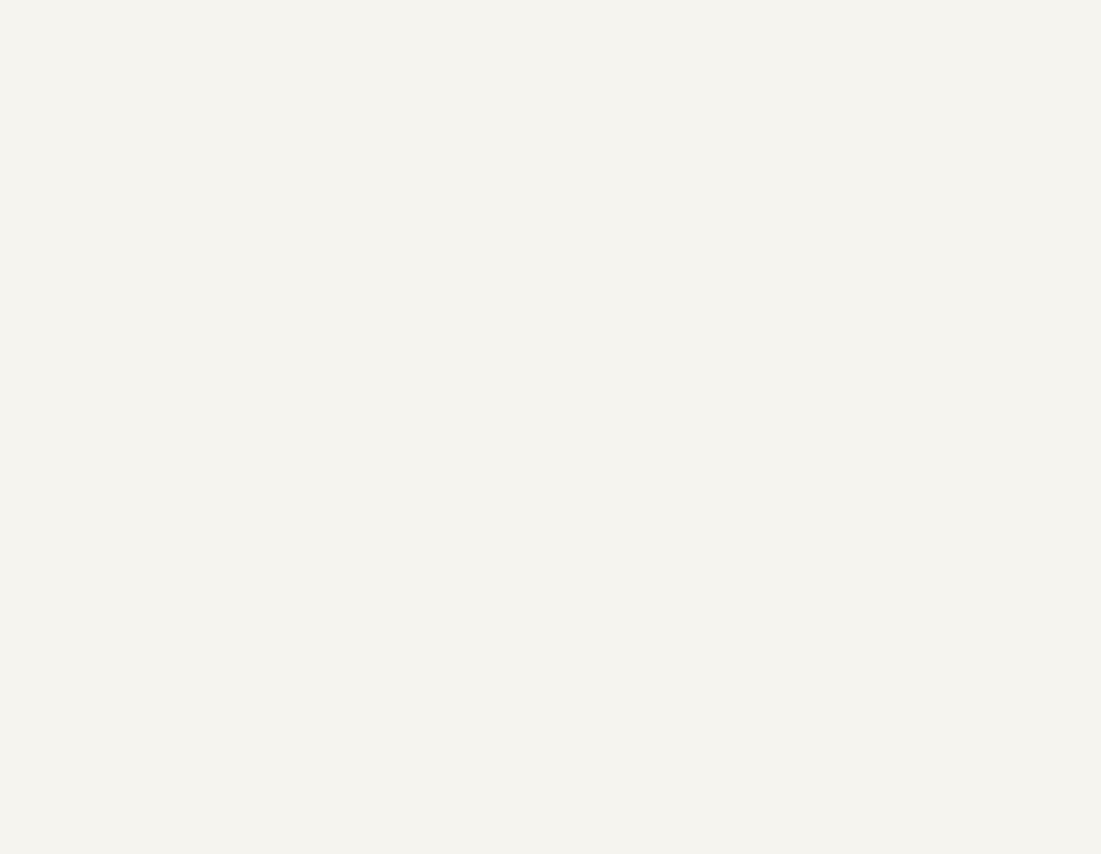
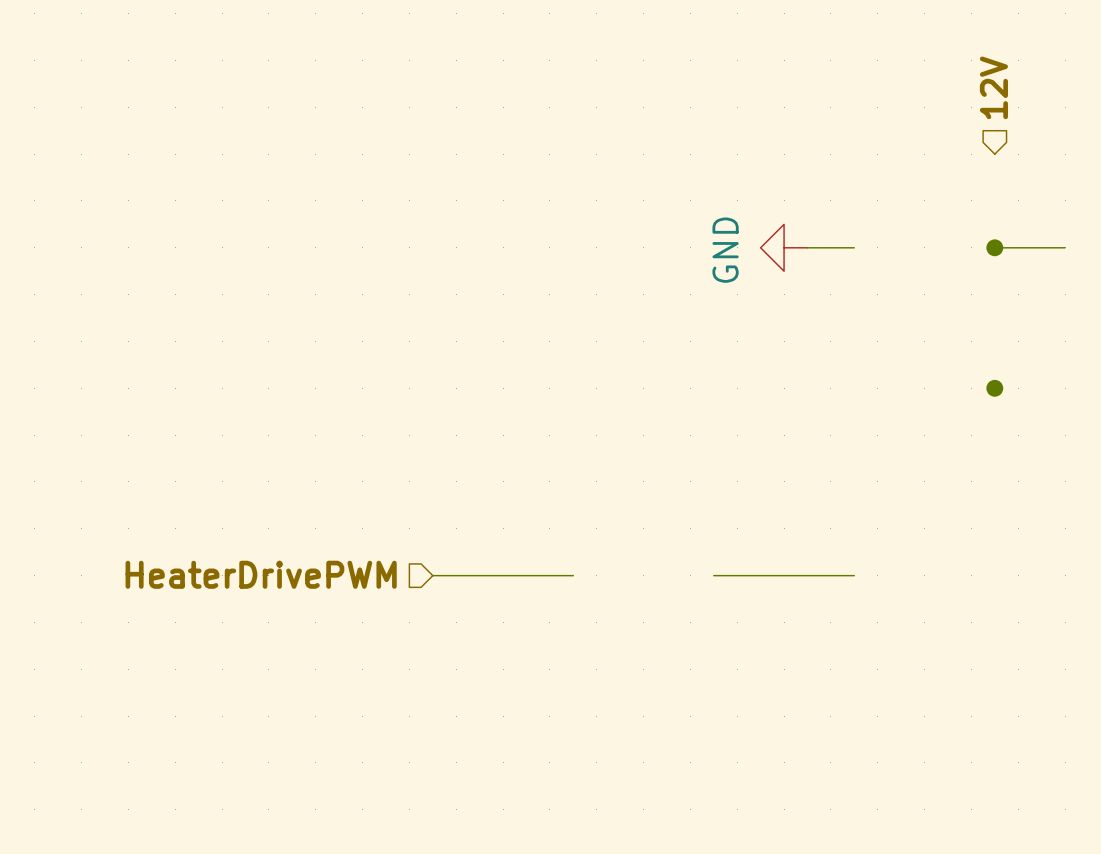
hierarchical label: none -> 12V (993, 87)
power symbol: none -> GND (784, 247)
wire: none -> (807, 247) (854, 247)
wire: none -> (994, 247) (1065, 247)
junction: none -> (994, 247)
junction: none -> (994, 388)
hierarchical label: none -> HeaterDrivePWM (261, 574)
wire: none -> (432, 575) (573, 575)
wire: none -> (713, 575) (854, 575)

